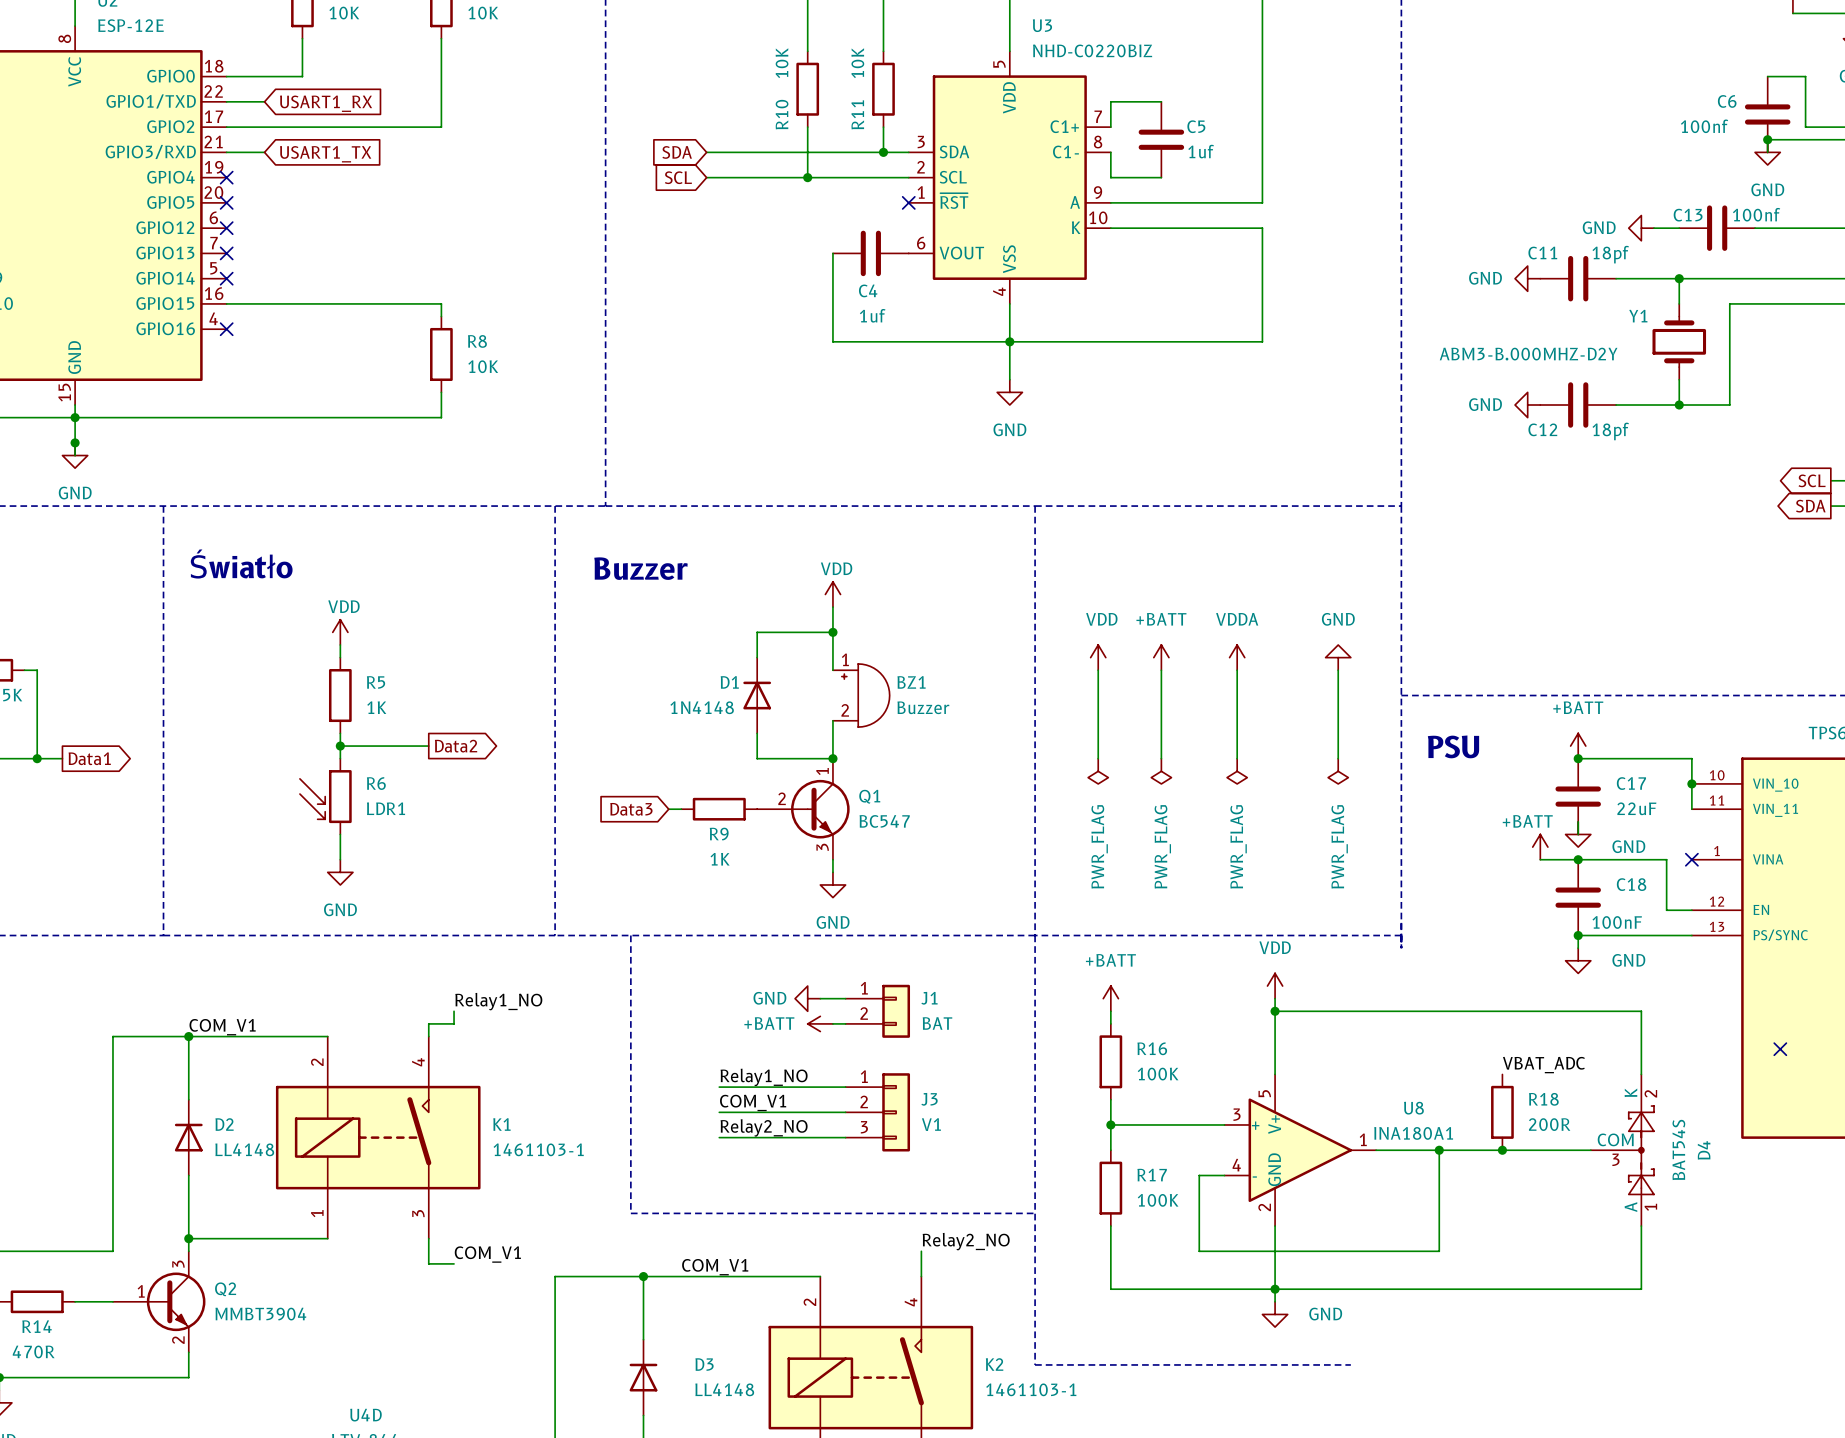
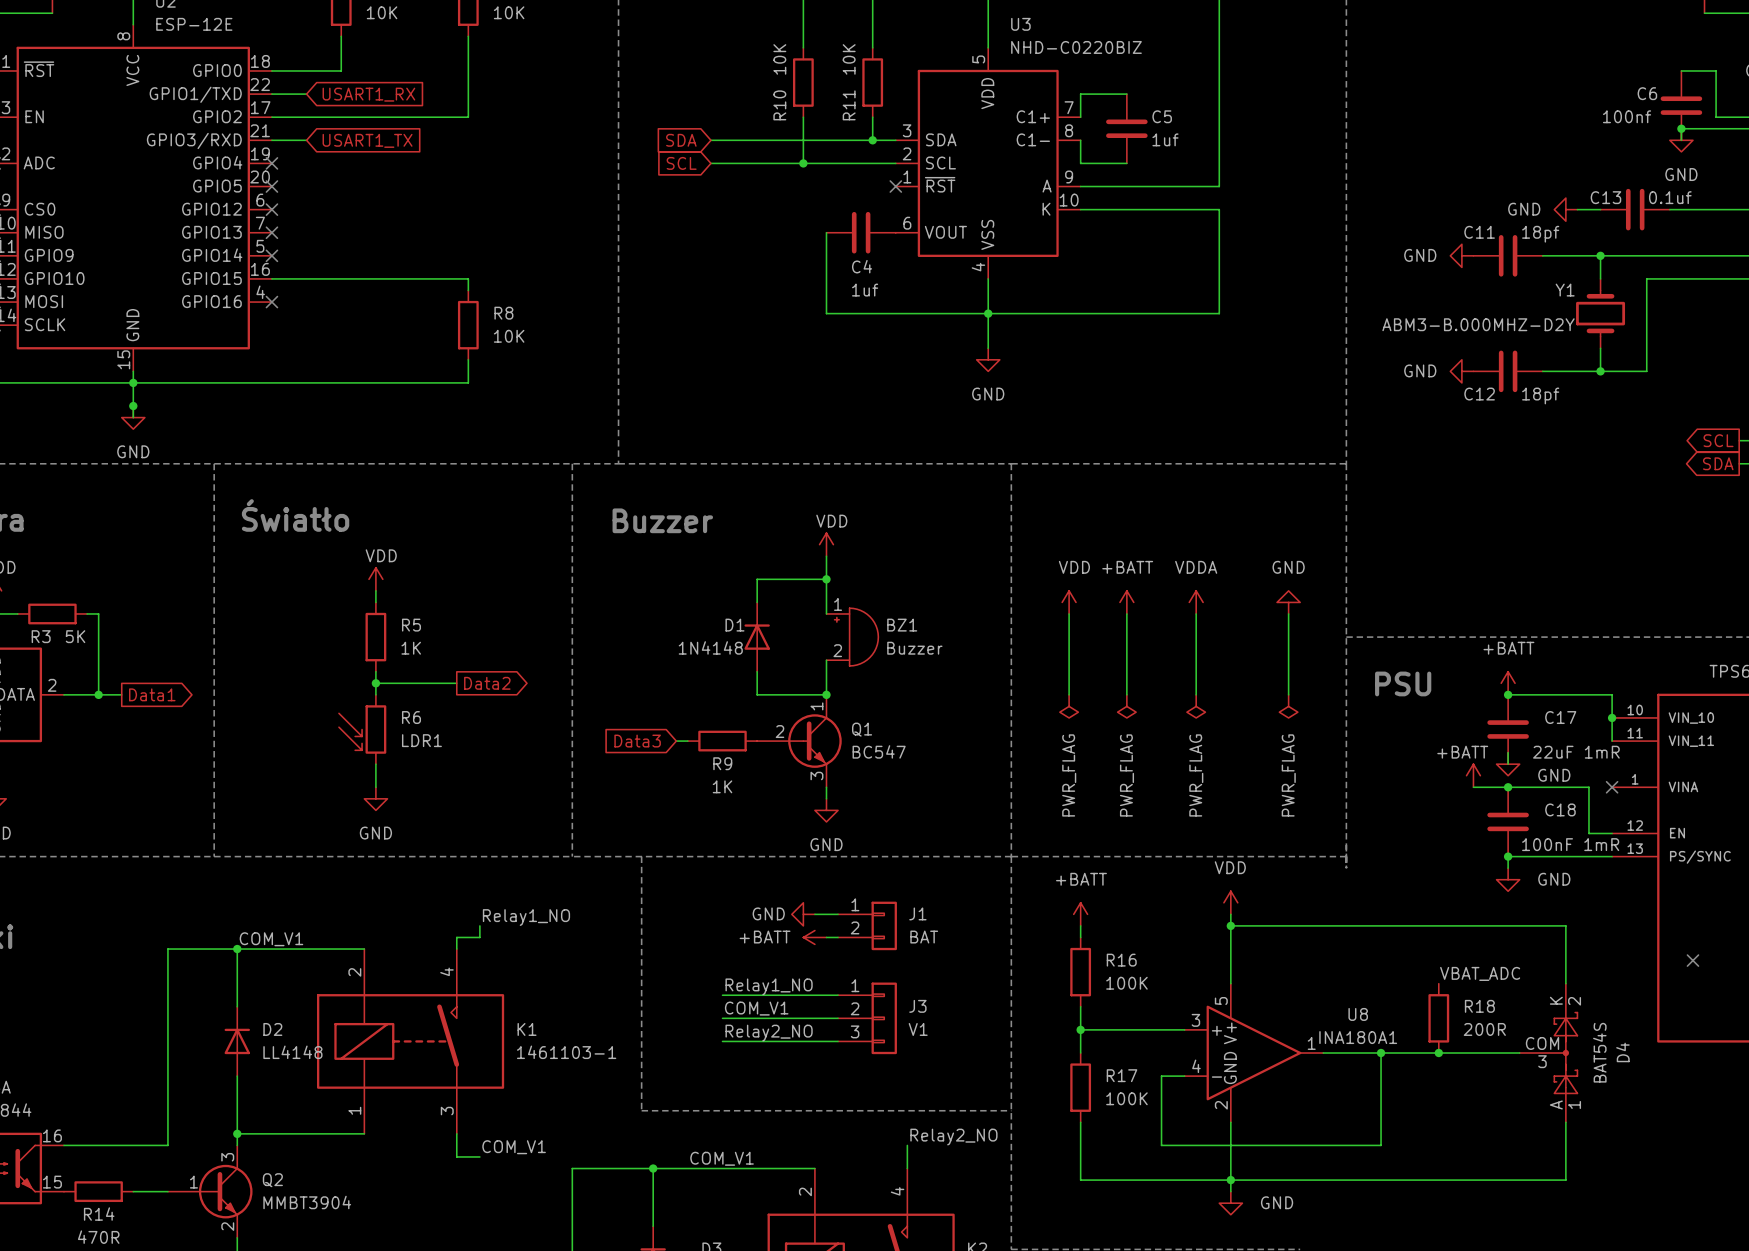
C13 value: 100nf (1756, 214) -> 0.1uf (1670, 197)
C17 value: 22uF (1636, 808) -> 22uF 1mR (1576, 752)
C18 value: 100nF (1617, 922) -> 100nF 1mR (1570, 844)

